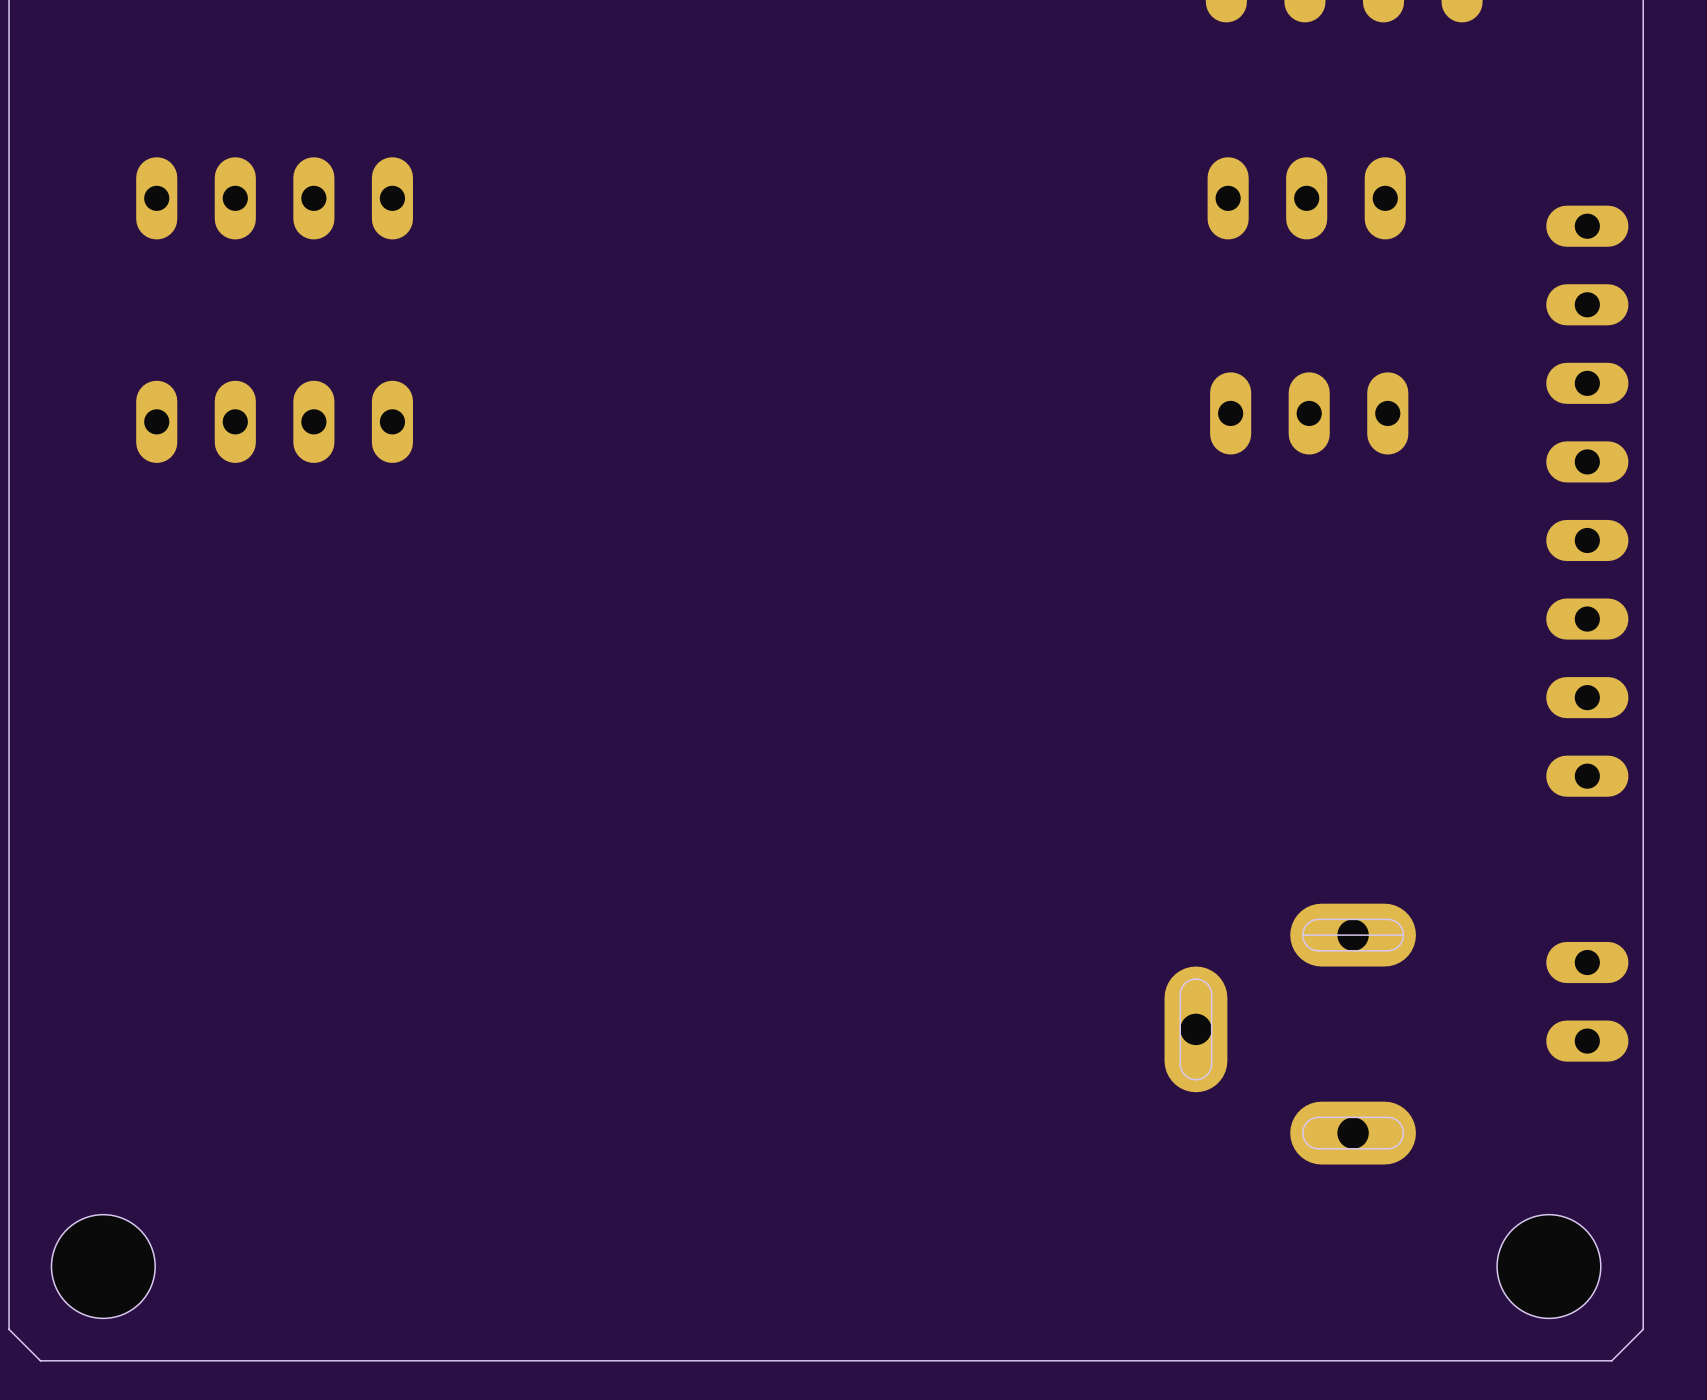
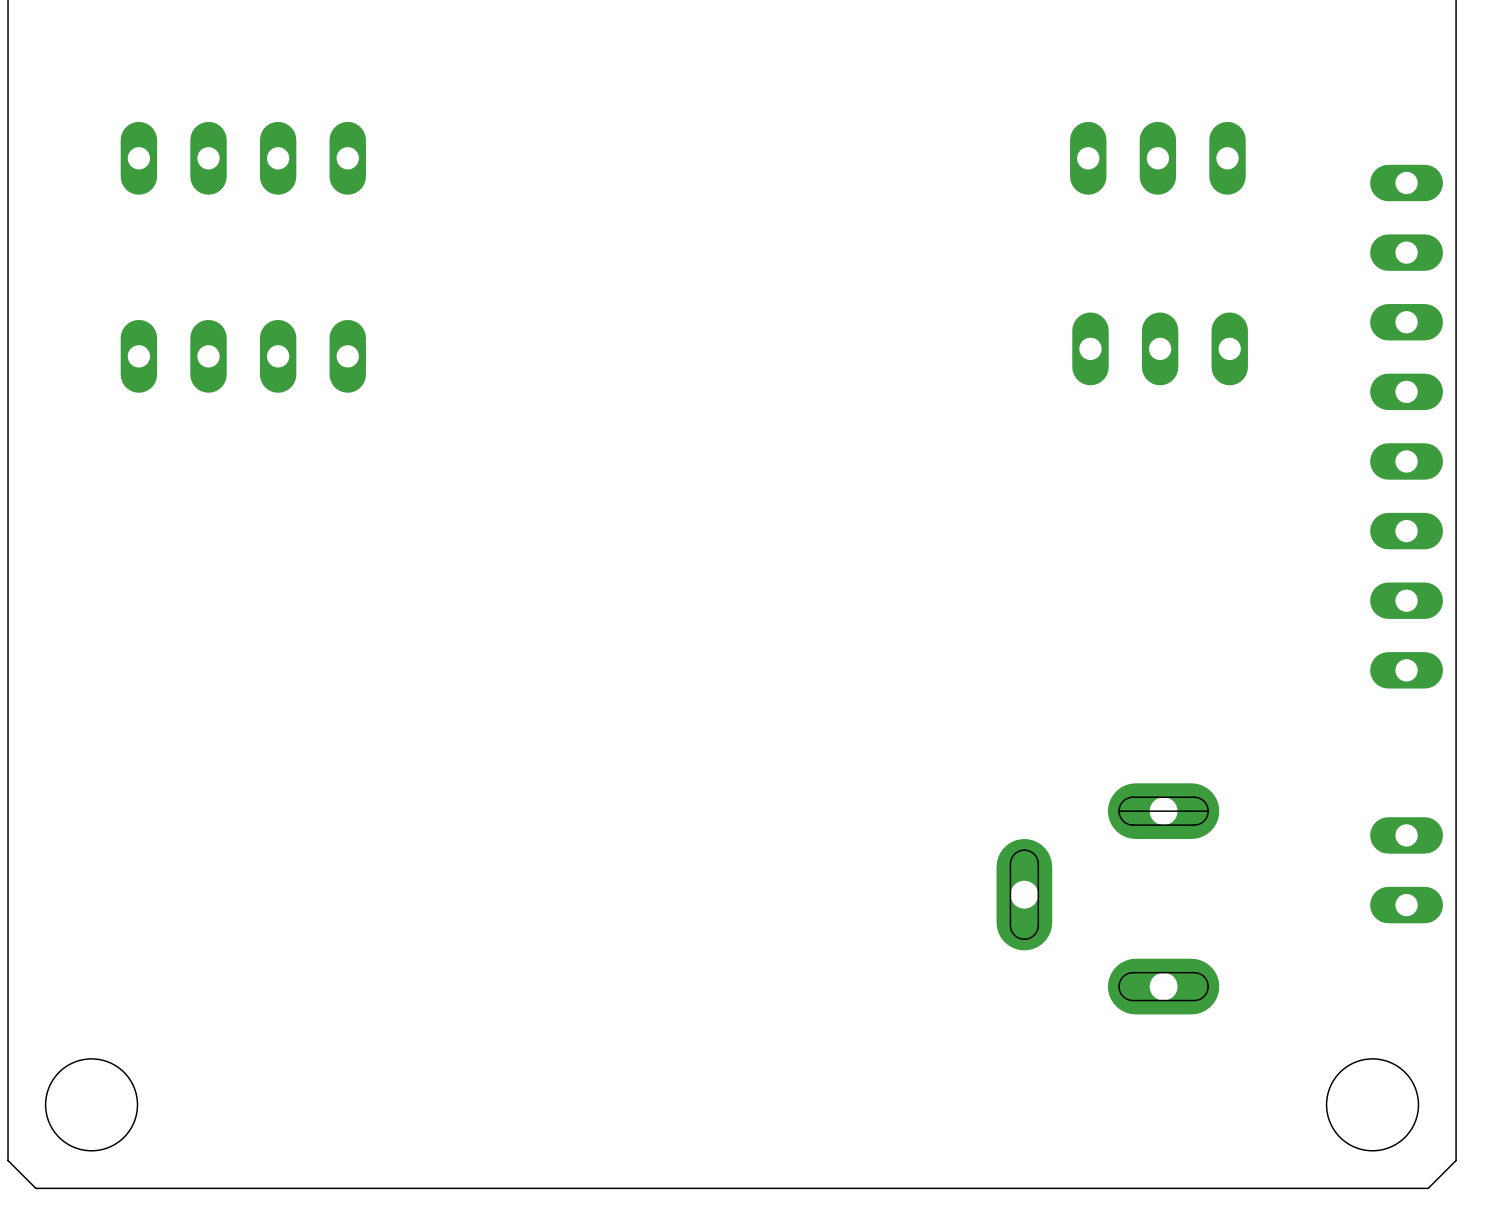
part position: (1290, 1034) -> (1107, 898)

